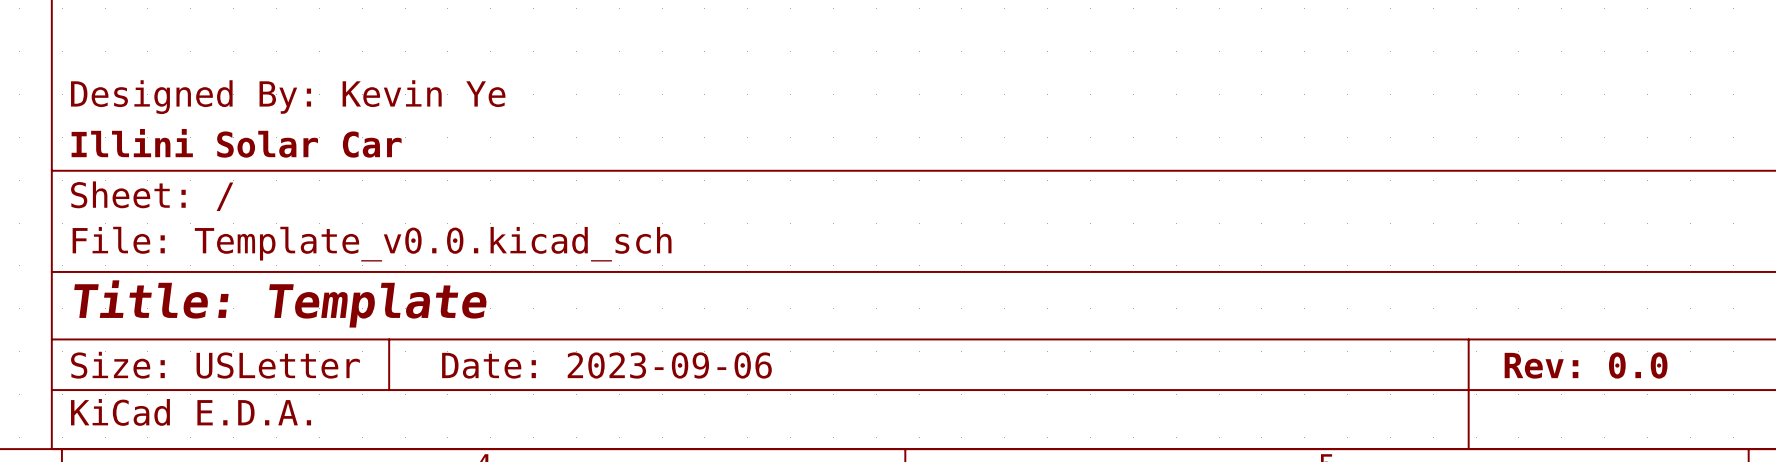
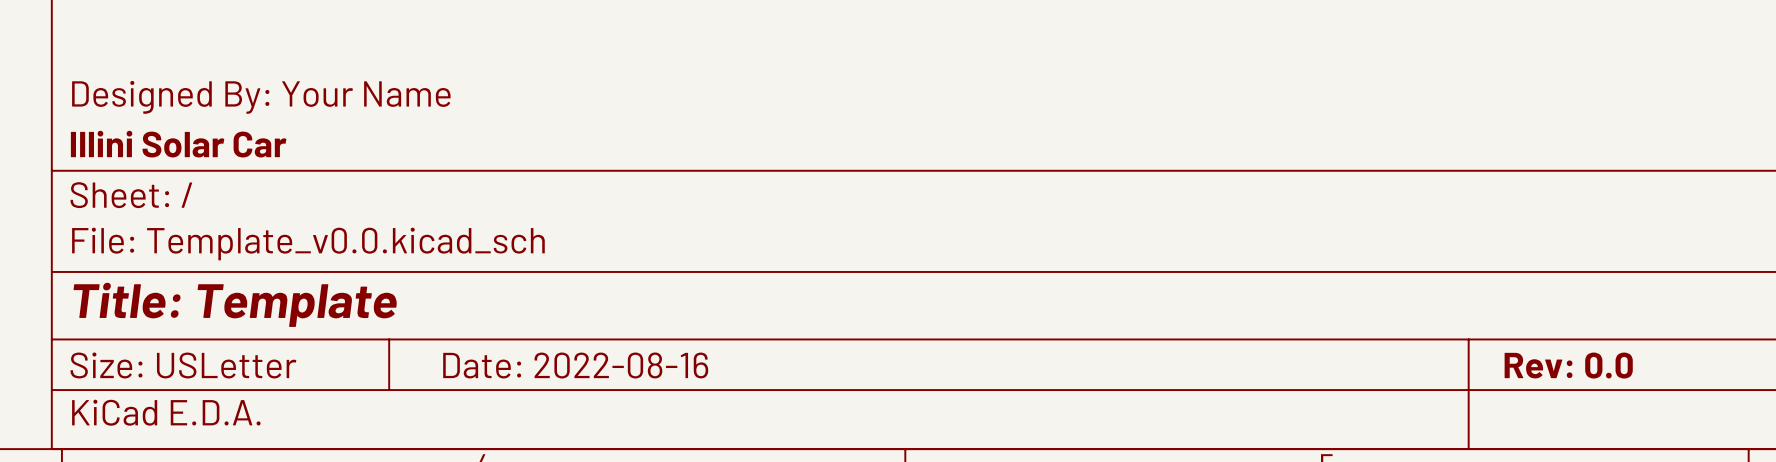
title block: Designed By: Kevin Ye (288, 97) -> Designed By: Your Name (261, 97)
title block: Date: 2023-09-06 (606, 365) -> Date: 2022-08-16 (575, 365)

